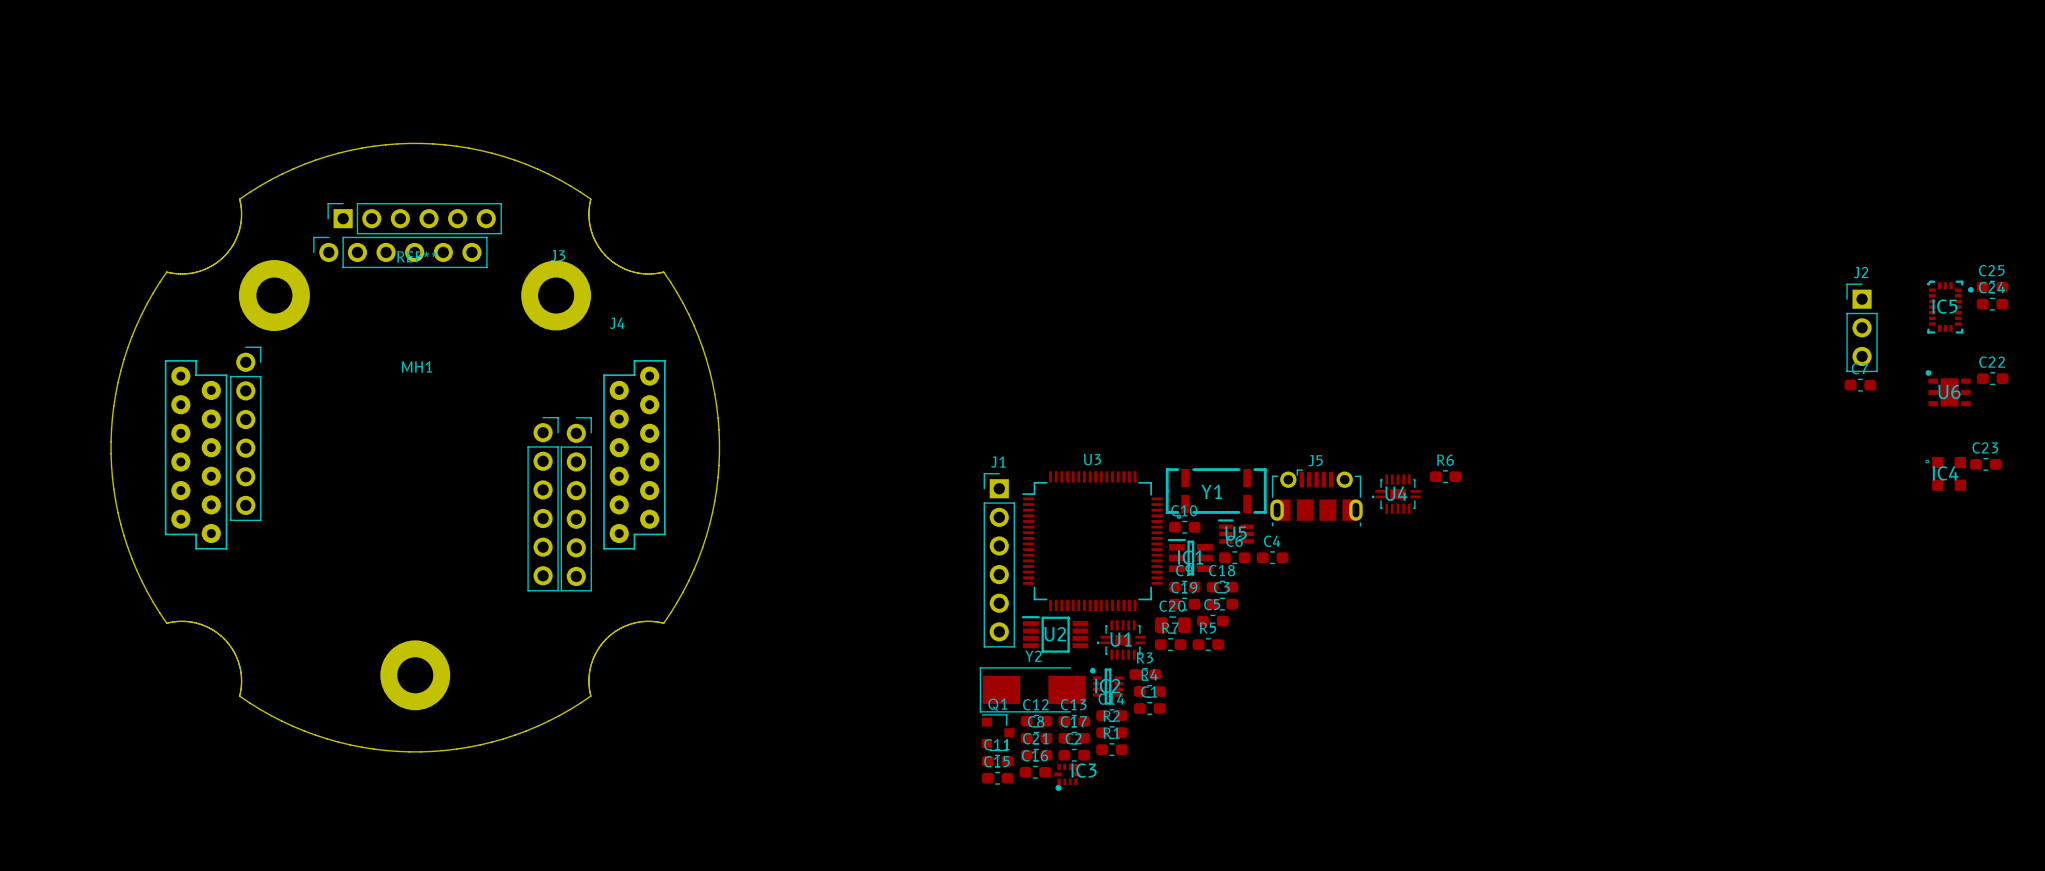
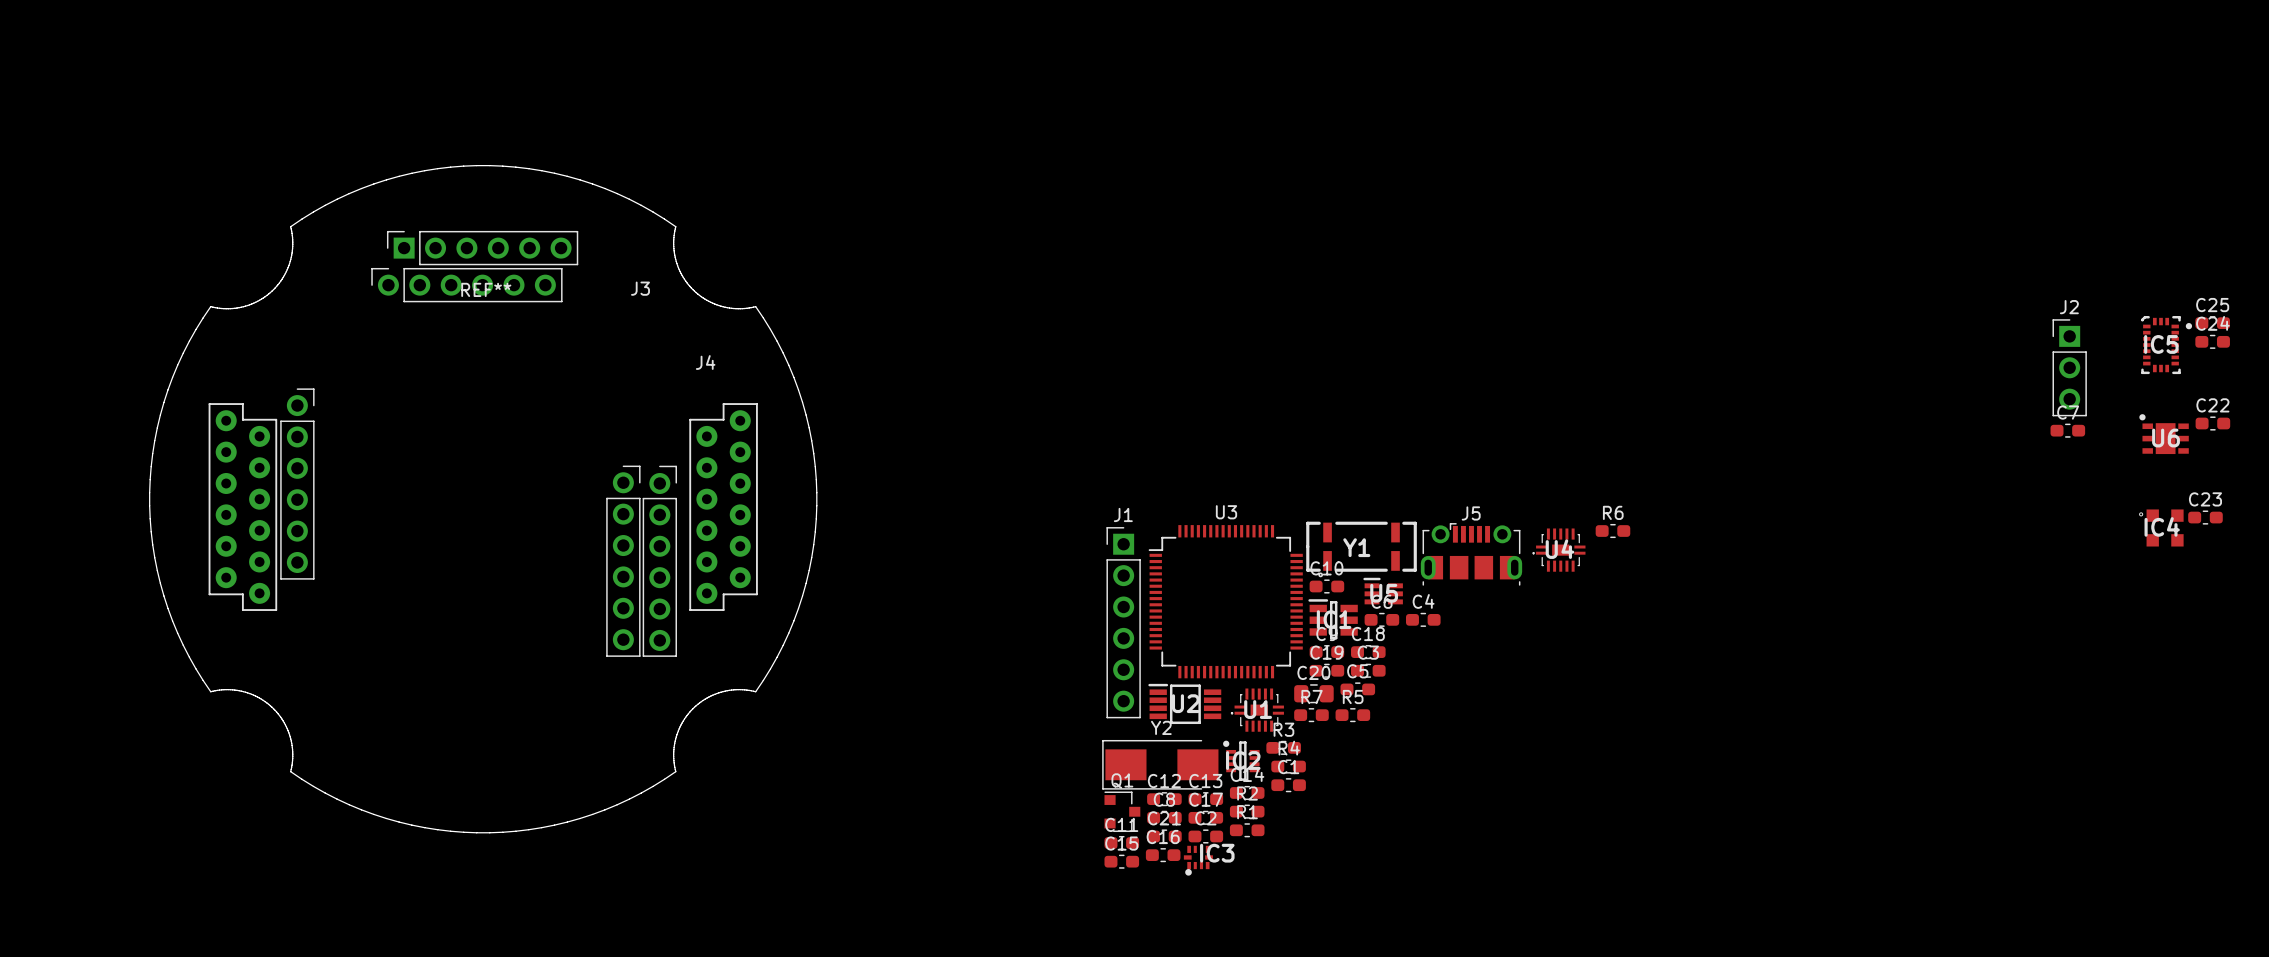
MH1: (414, 485) -> none

